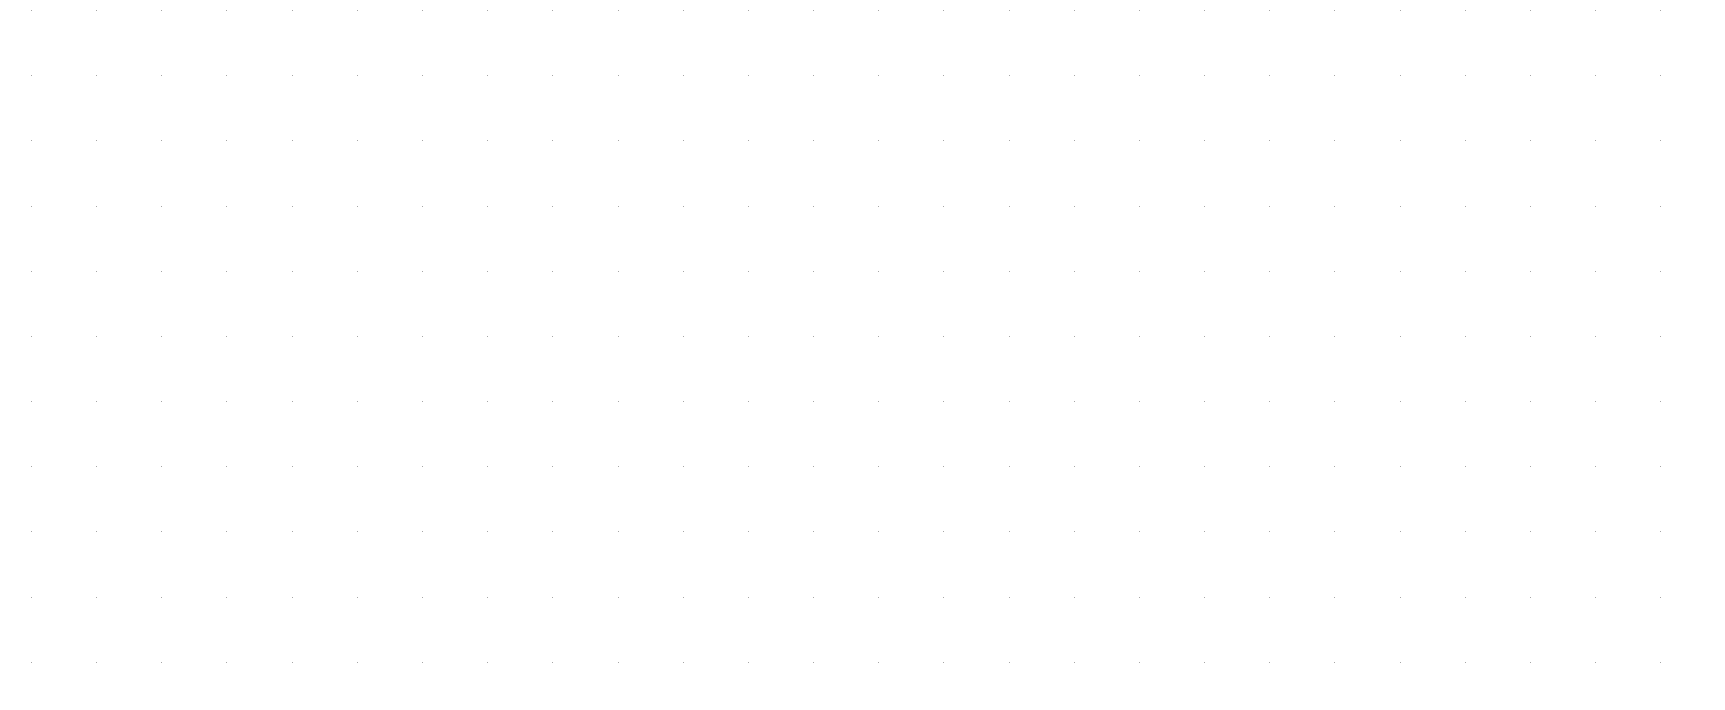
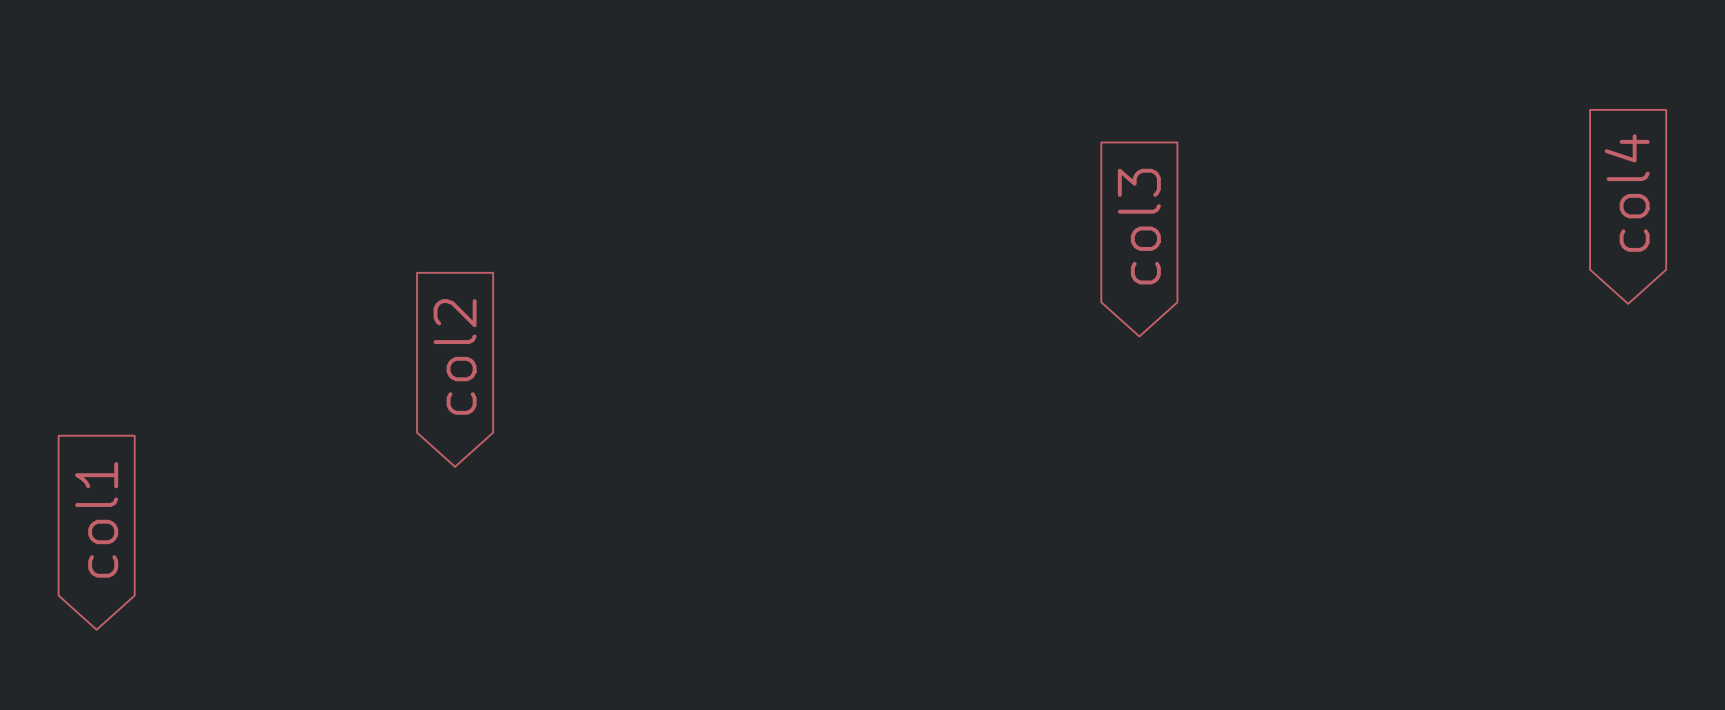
global label: none -> col4 (1627, 193)
global label: none -> col3 (1139, 226)
global label: none -> col2 (455, 356)
global label: none -> col1 (96, 519)

